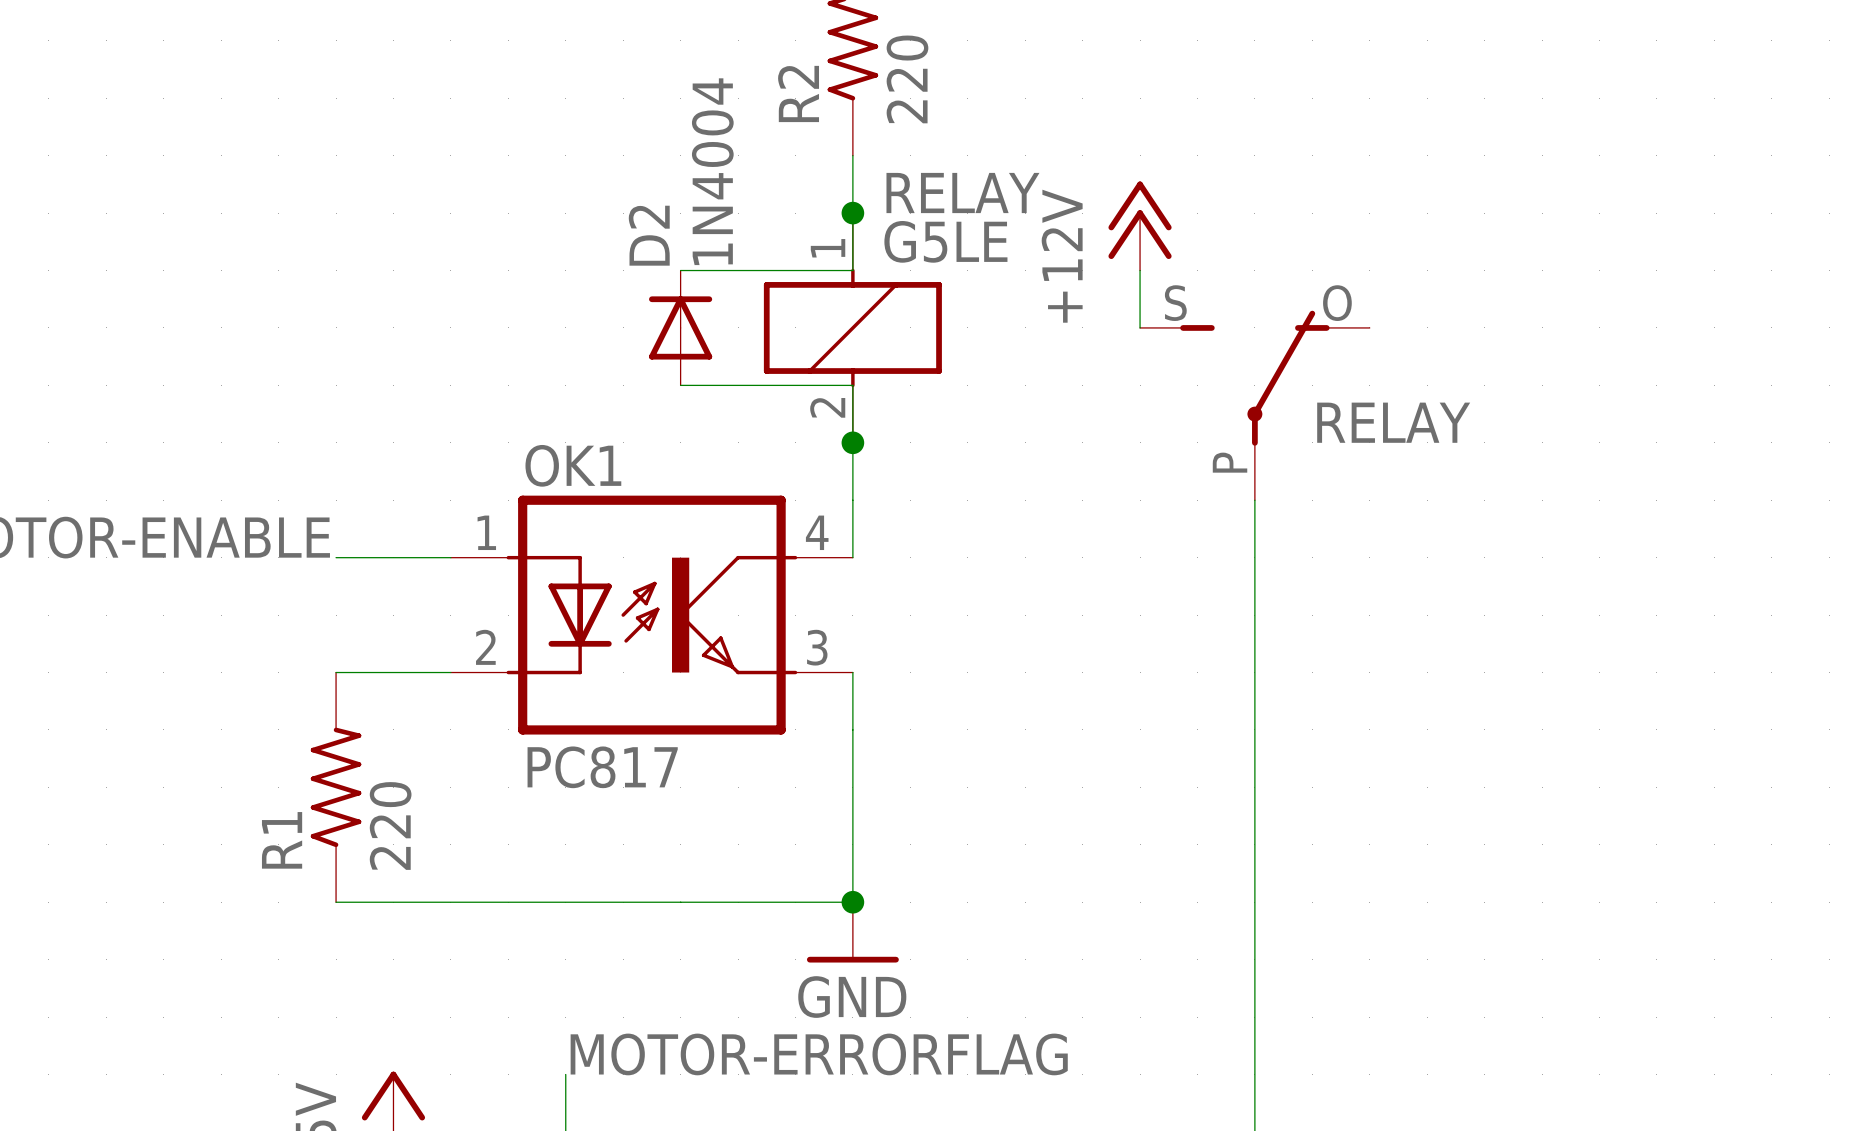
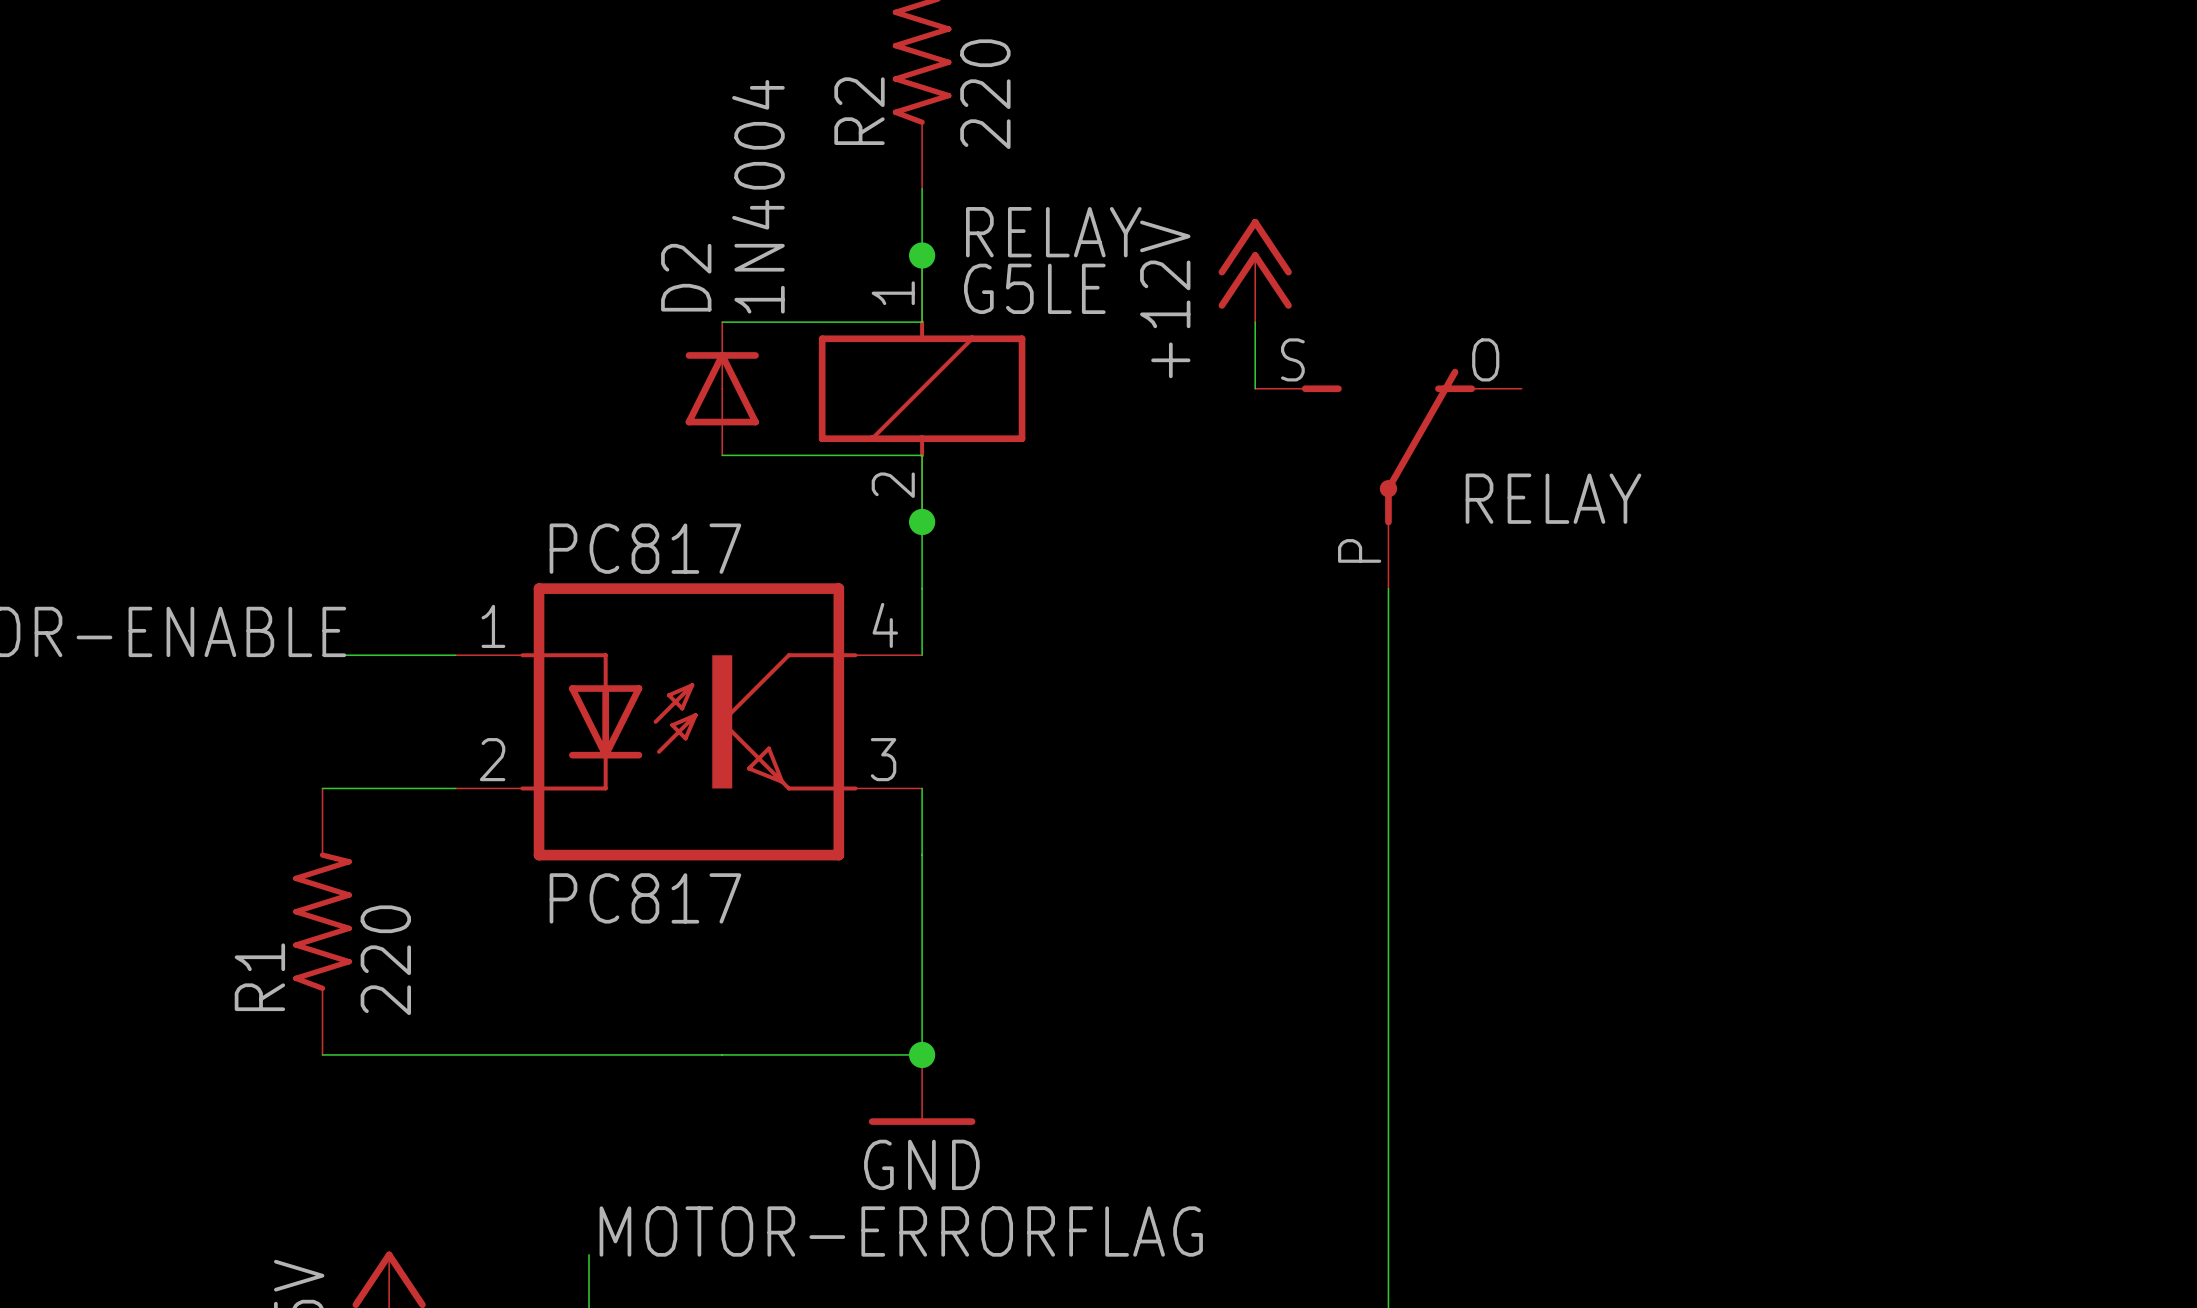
OK1 name: OK1 (573, 465) -> PC817 (645, 548)

